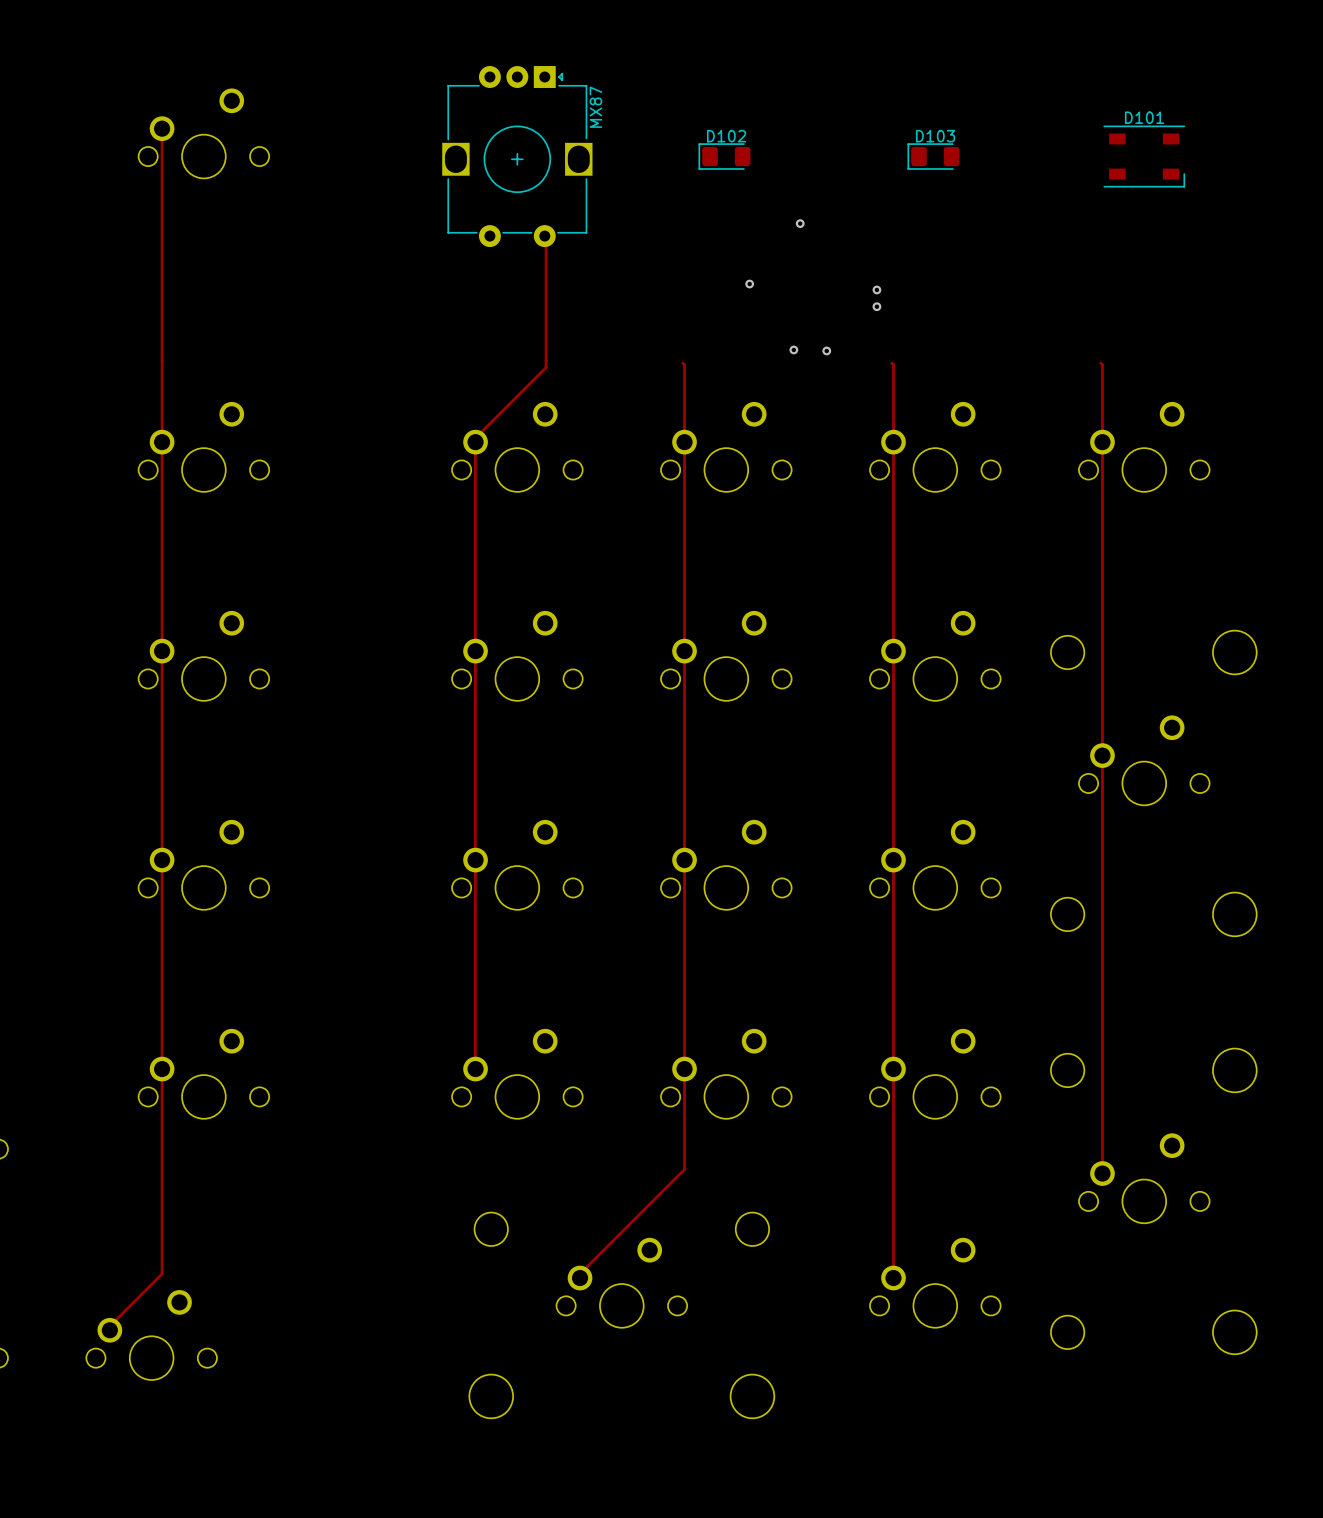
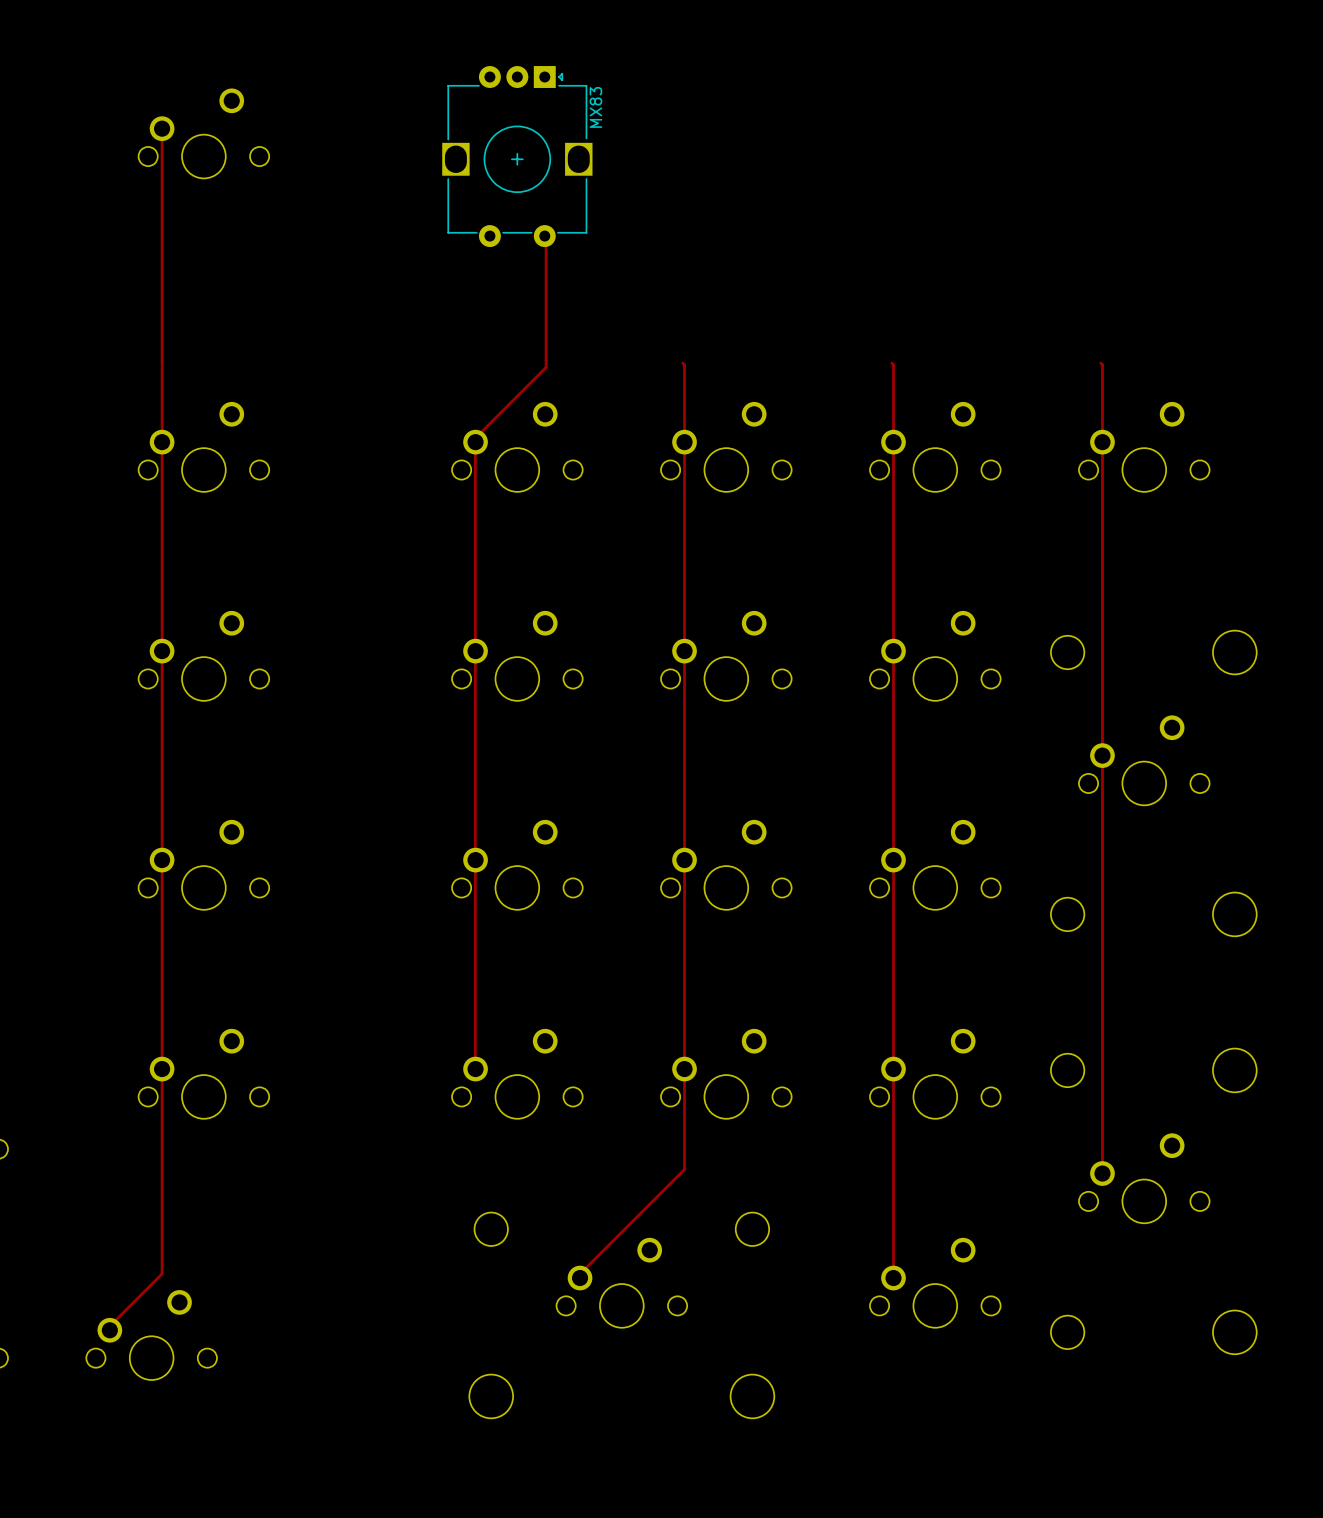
MX87 name: MX87 (595, 107) -> MX83 (595, 107)
D102: (724, 156) -> none
D103: (933, 156) -> none
D101: (1144, 156) -> none
via: (800, 223) -> none
via: (749, 284) -> none
via: (876, 289) -> none
via: (876, 306) -> none
via: (793, 349) -> none
via: (826, 350) -> none

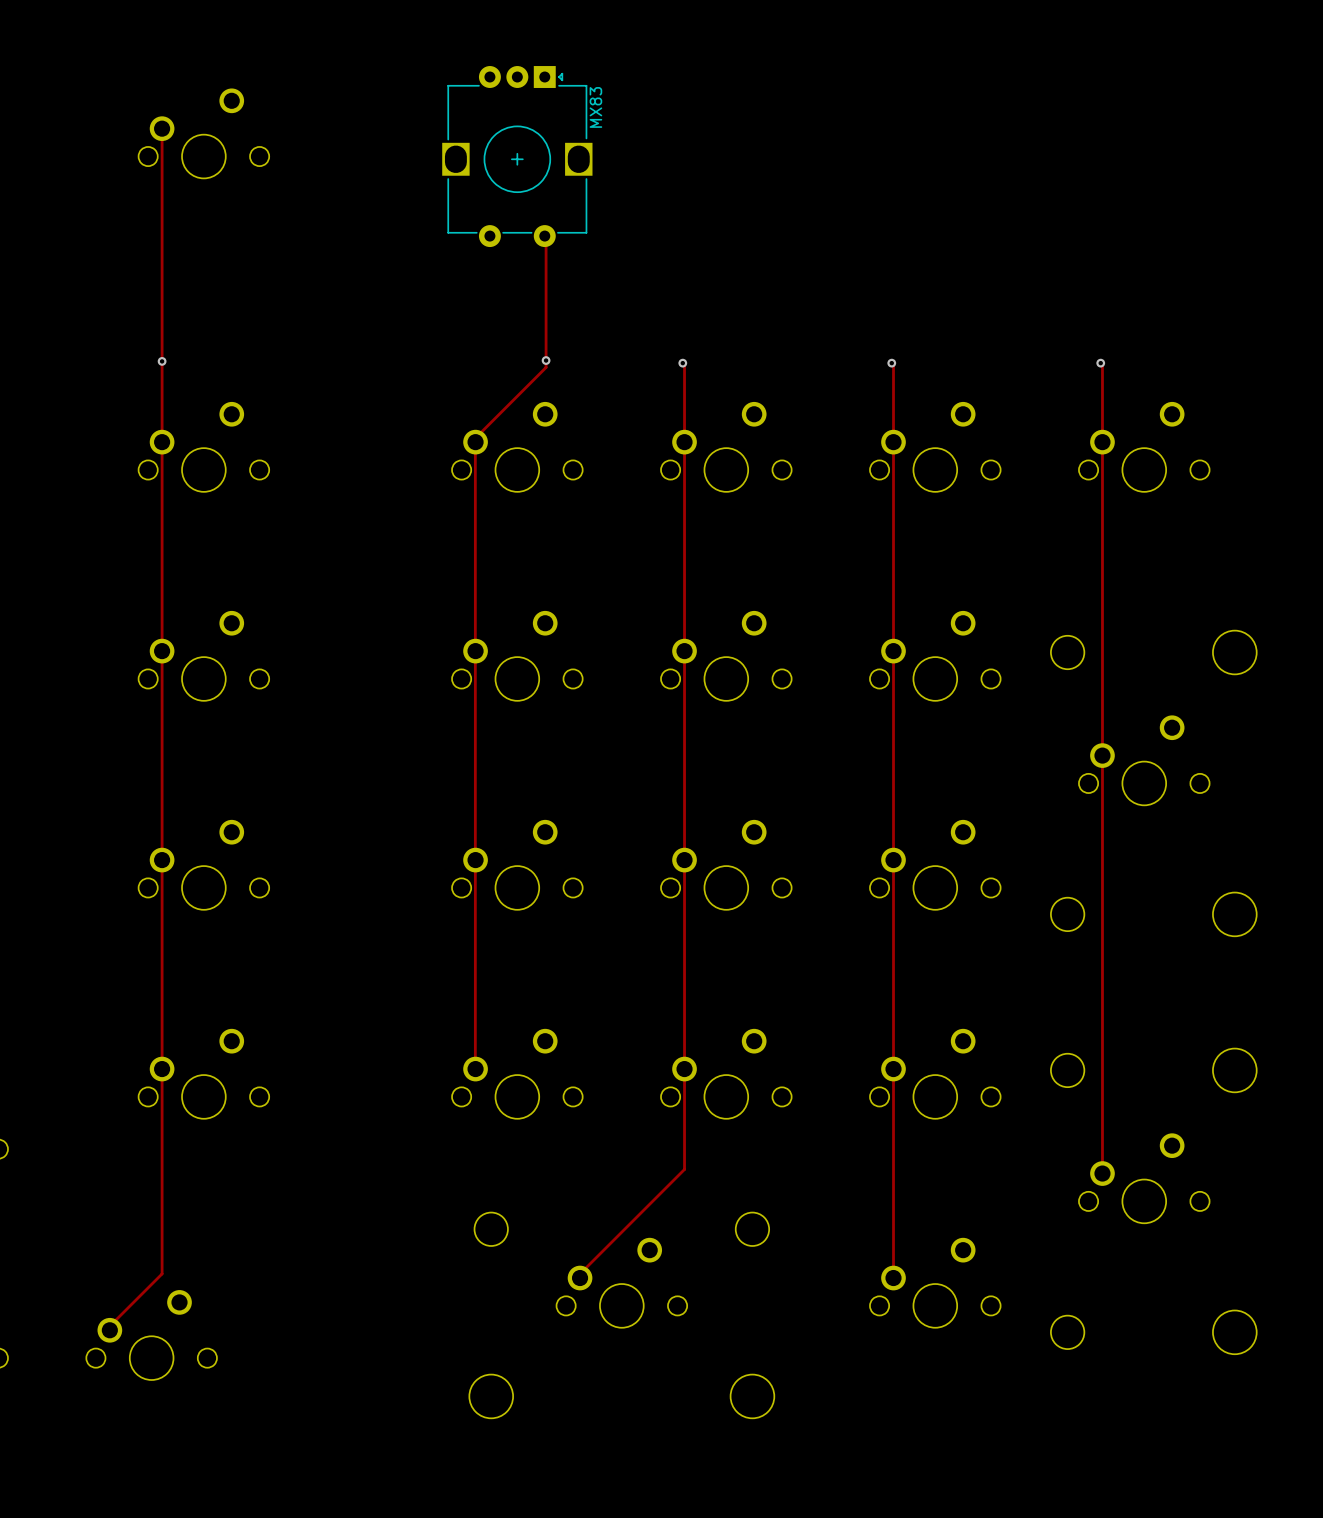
via: none -> (546, 360)
via: none -> (162, 361)
via: none -> (682, 363)
via: none -> (891, 363)
via: none -> (1100, 363)

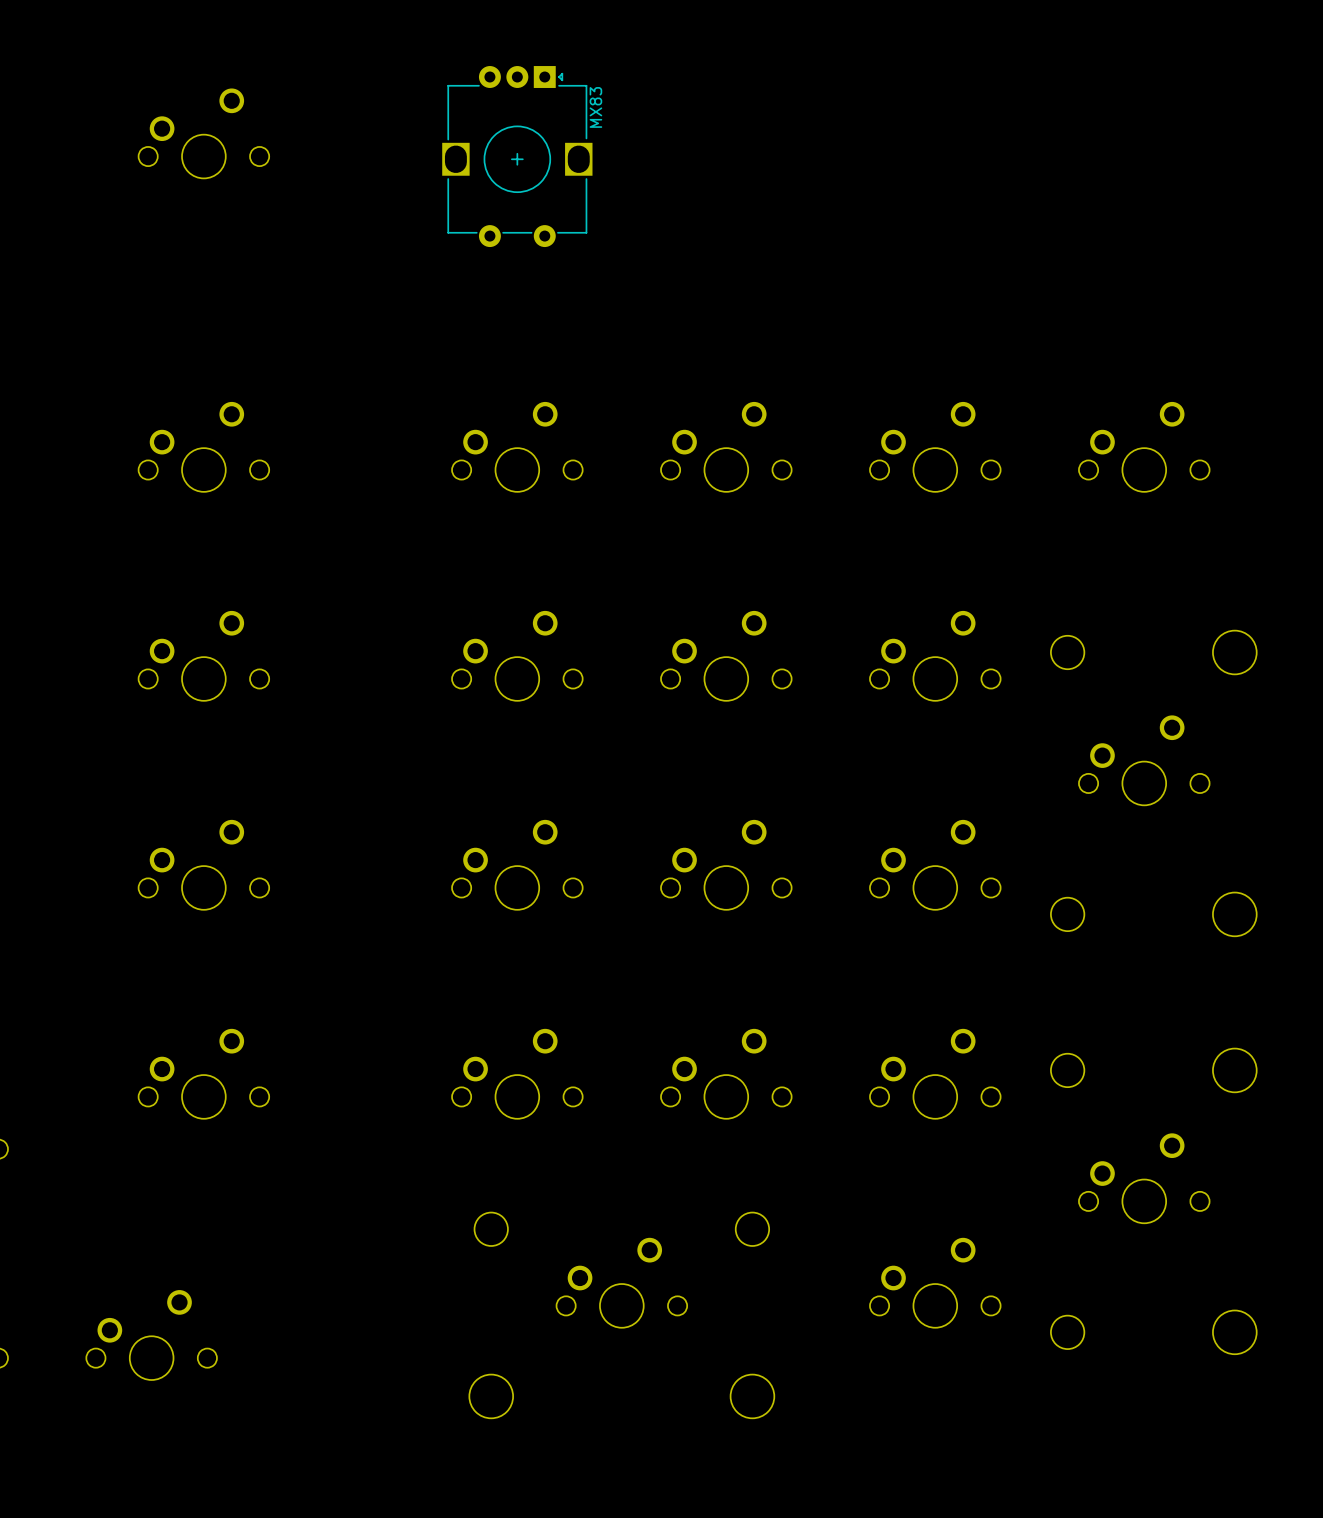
track: (162, 128) (162, 1273) (108, 1327) -> none
track: (546, 237) (546, 367) (473, 439) (475, 441) (475, 1073) -> none
via: (546, 360) -> none
via: (162, 361) -> none
track: (682, 363) (684, 364) (684, 1169) (578, 1275) -> none
via: (682, 363) -> none
track: (891, 363) (893, 364) (893, 1273) -> none
via: (891, 363) -> none
track: (1100, 363) (1102, 364) (1102, 1169) -> none
via: (1100, 363) -> none

